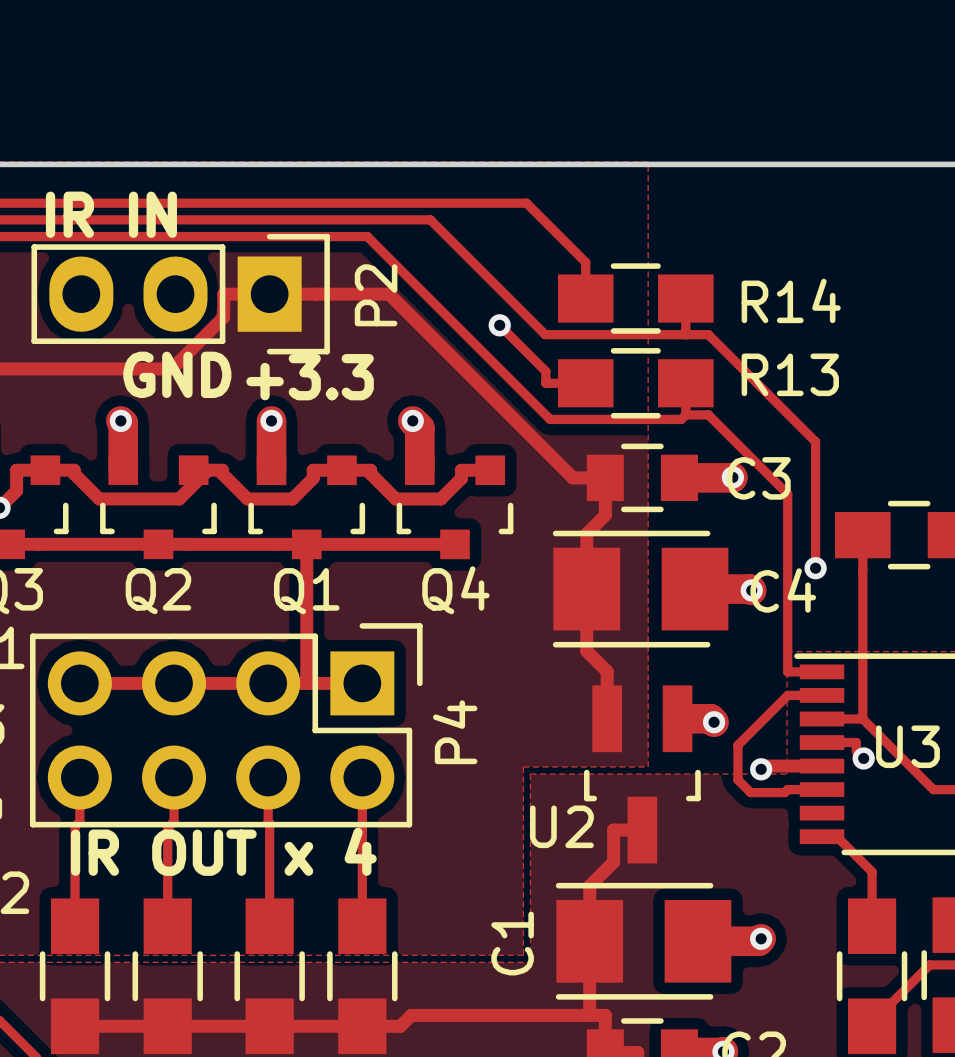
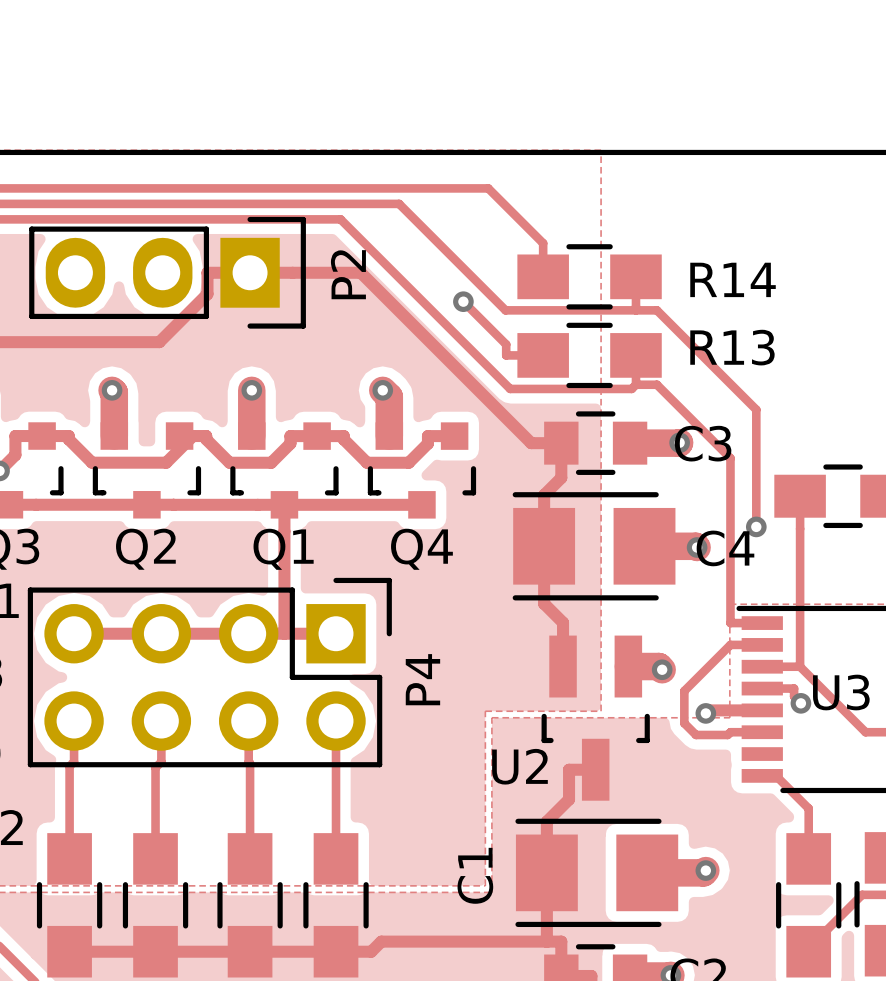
text: IR IN (111, 214) -> none
text: GND (177, 374) -> none
text: +3.3 (310, 377) -> none
text: IR OUT x 4 (223, 851) -> none

